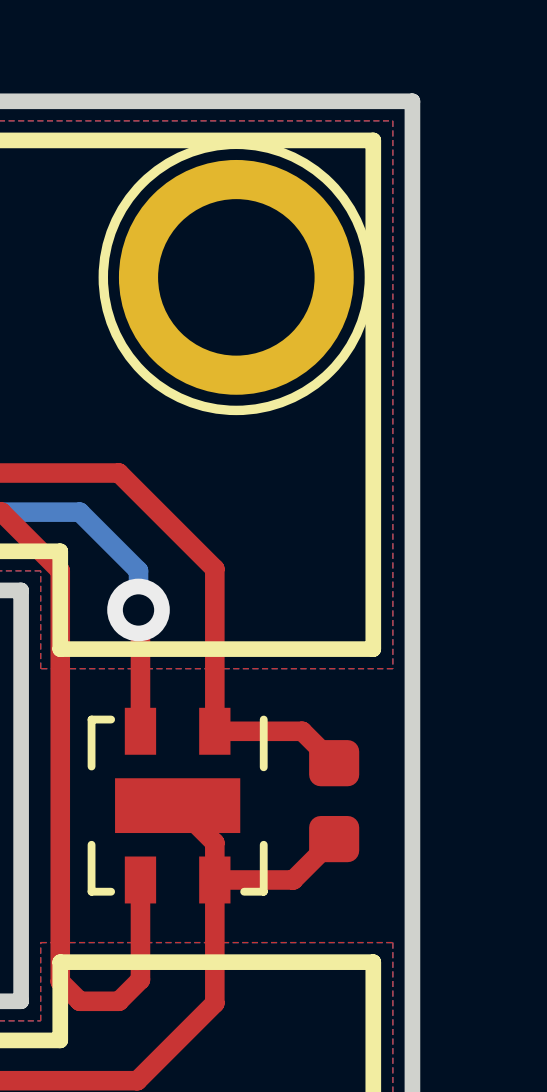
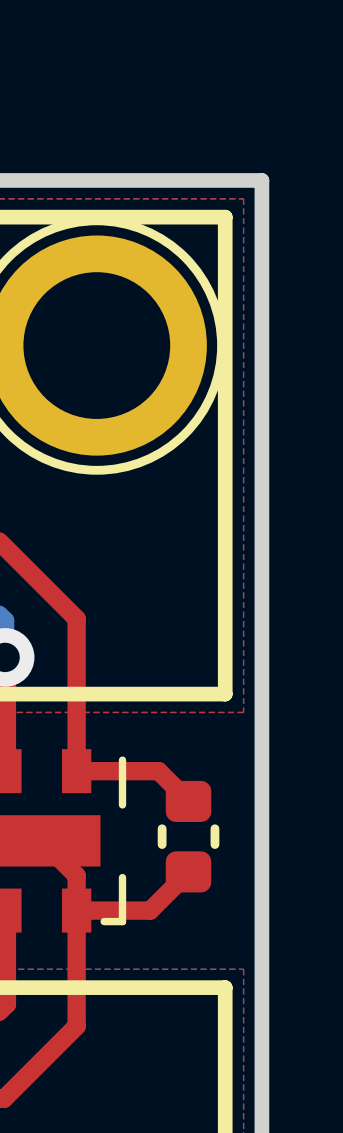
part footprint: [309, 740, 360, 863] -> [157, 780, 220, 893]

